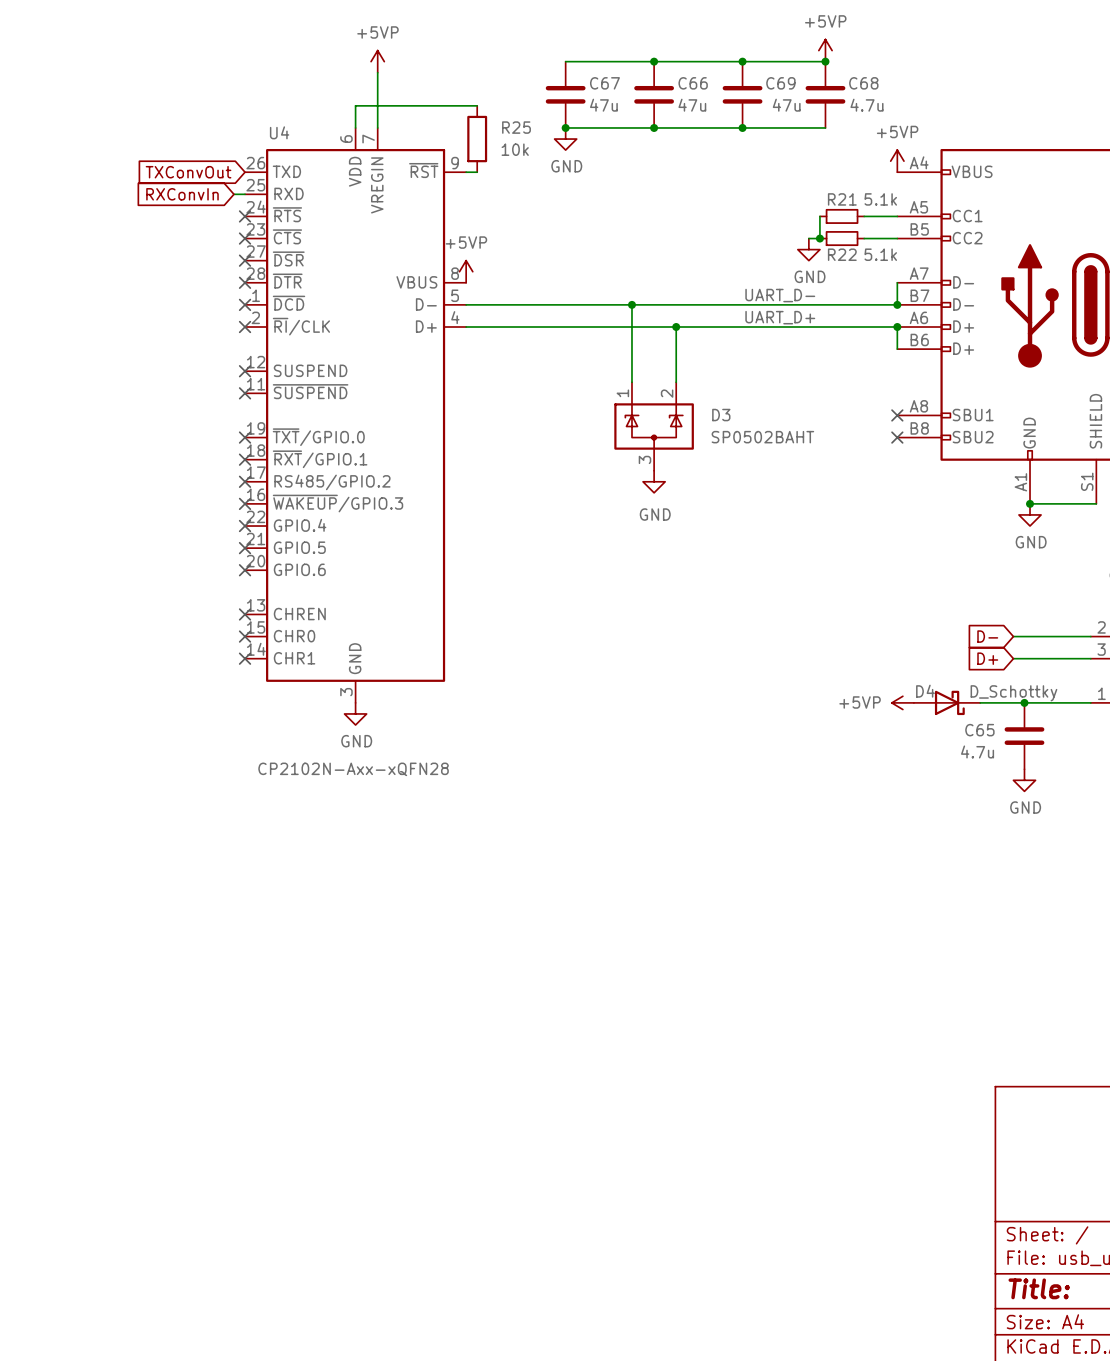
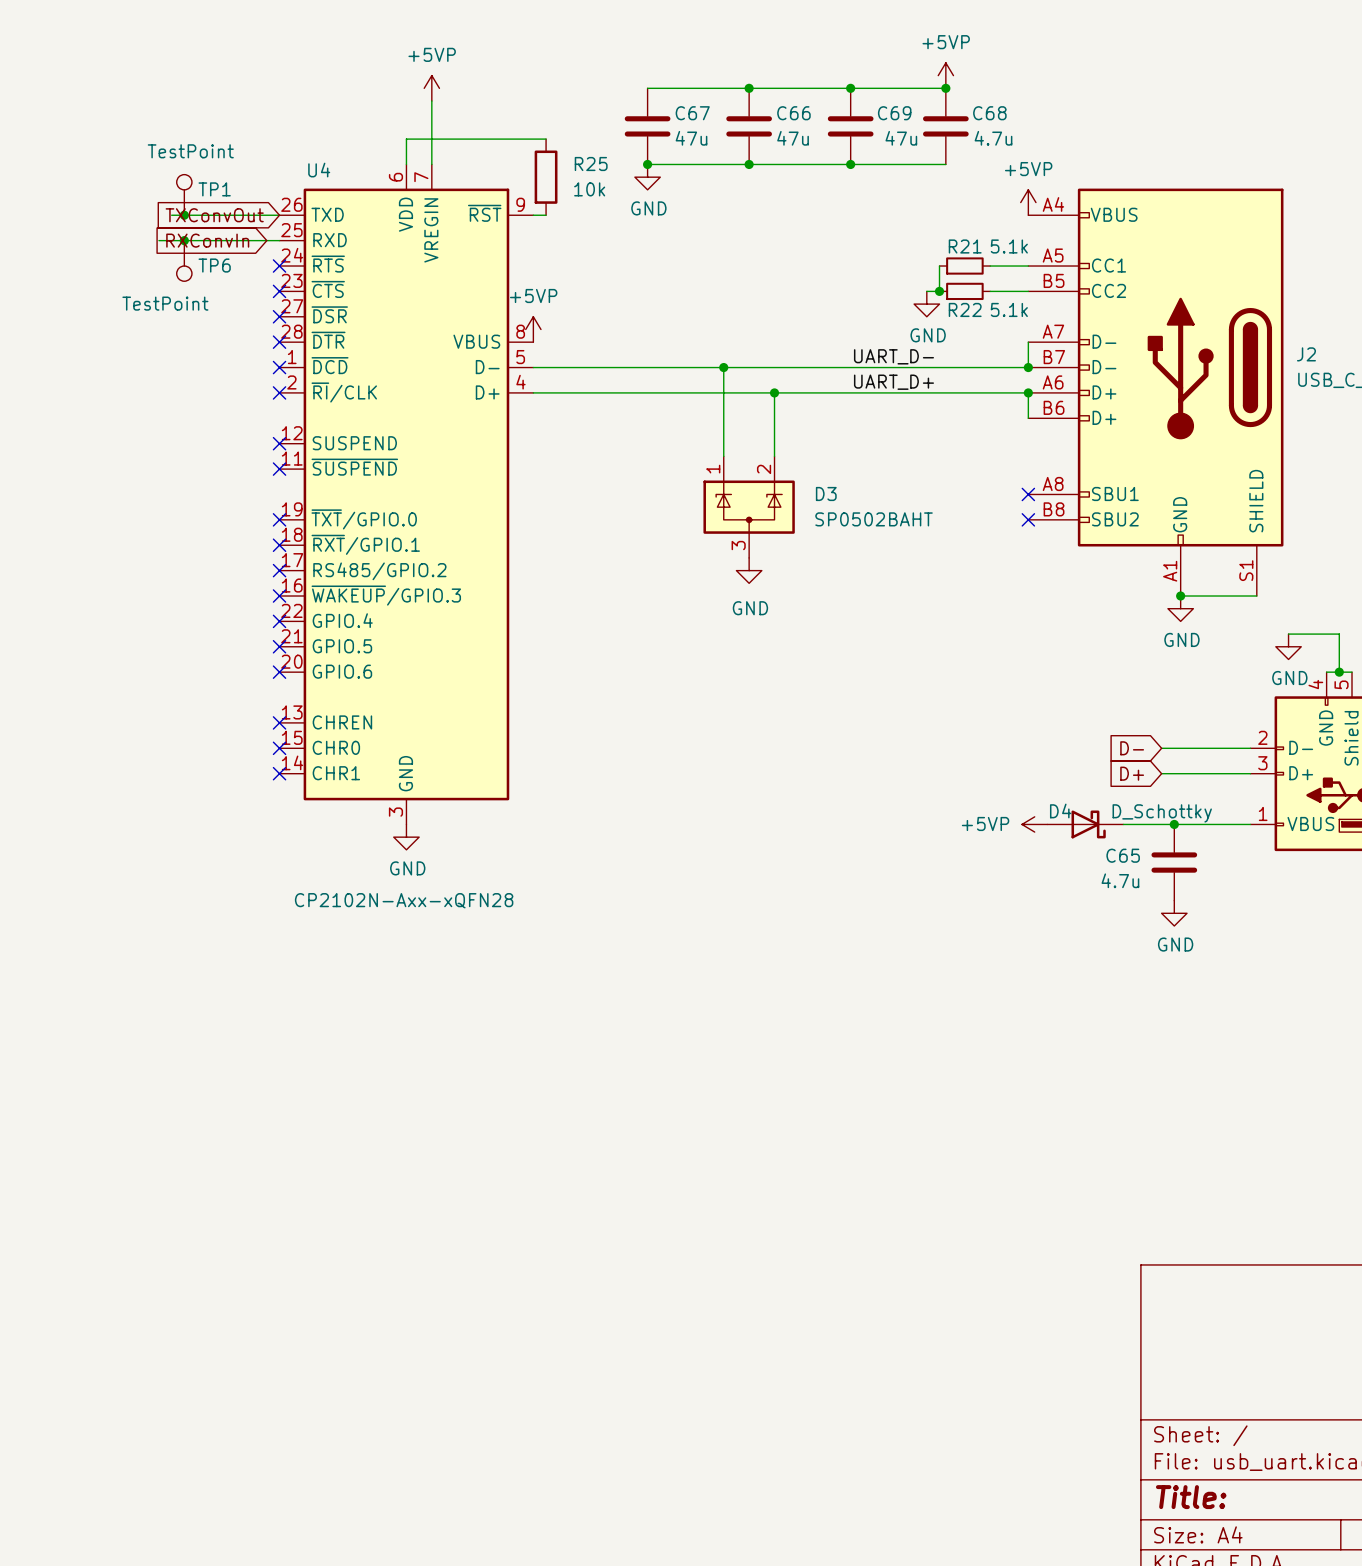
TP1: none -> TestPoint (184, 194)
wire: none -> (171, 215) (279, 215)
junction: none -> (184, 215)
wire: none -> (158, 240) (266, 240)
junction: none -> (184, 240)
TP6: none -> TestPoint (184, 260)

